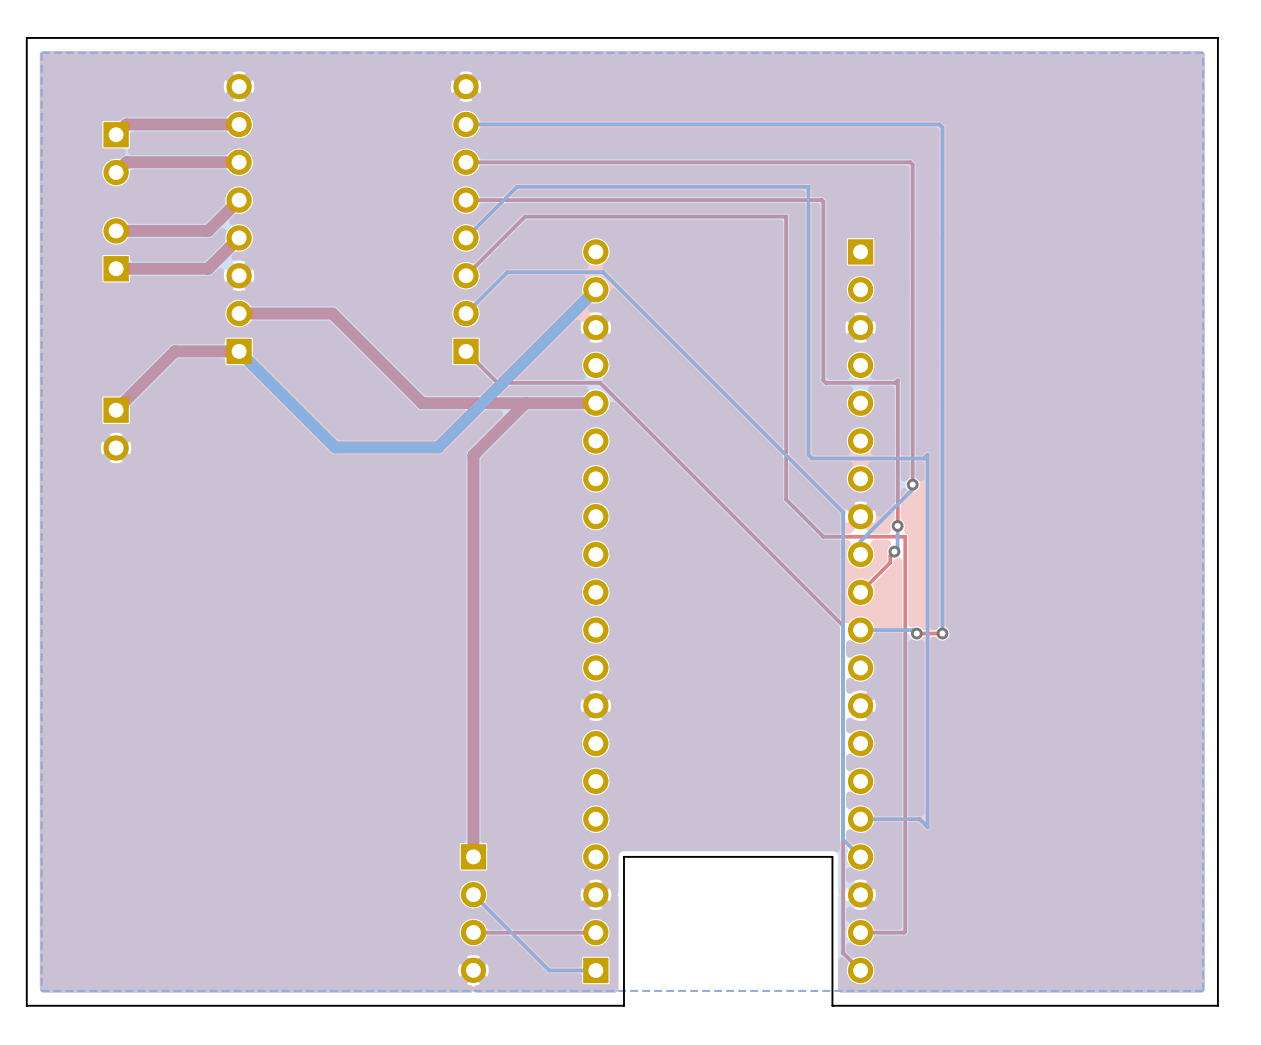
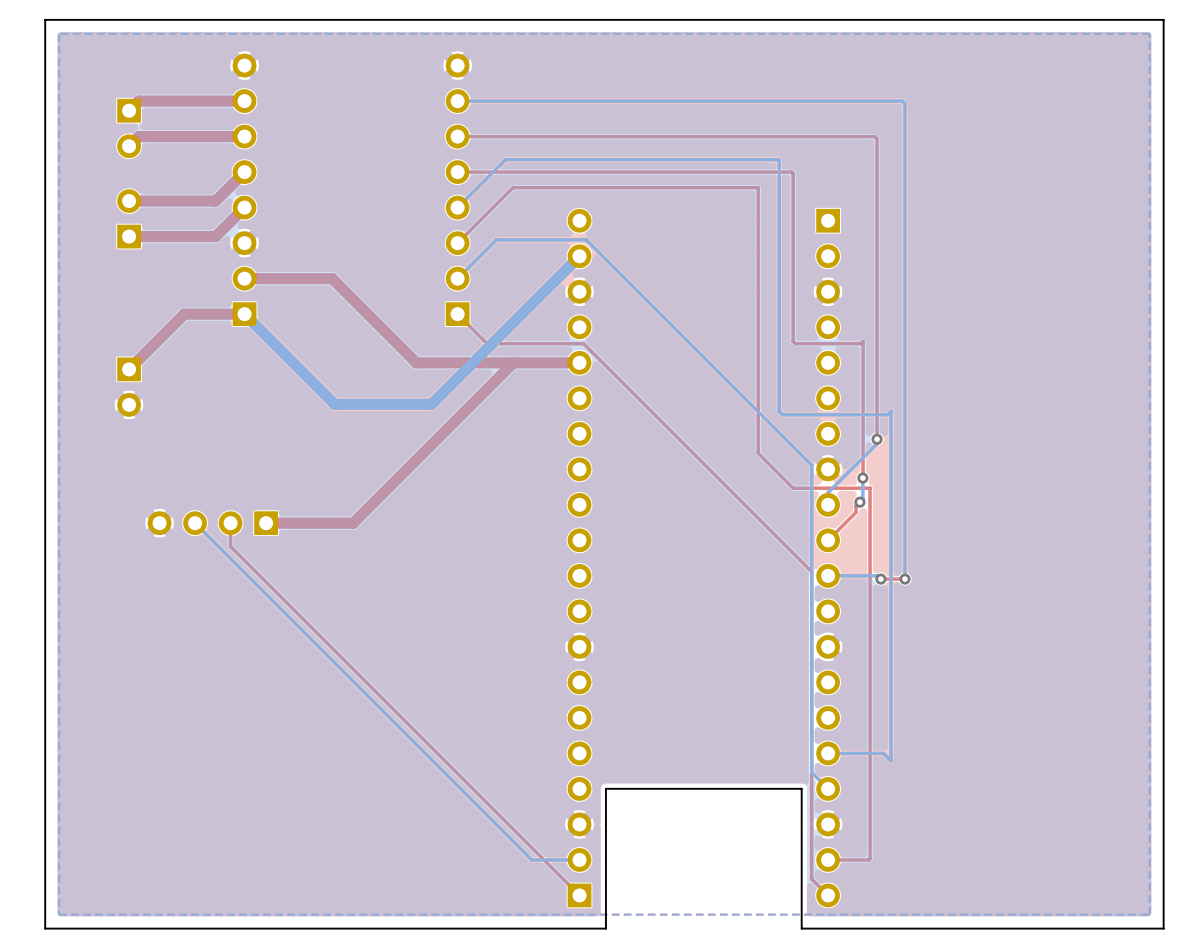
top track: (473, 455) (473, 856) -> (464, 411) (353, 523) (266, 523)
bottom track: none -> (195, 523) (531, 859) (579, 859)
part: none -> (212, 523)
top track: none -> (230, 523) (230, 546) (579, 895)
bottom track: (473, 894) (549, 970) (595, 970) -> none
part: (473, 913) -> none
top track: (595, 932) (473, 932) -> none

